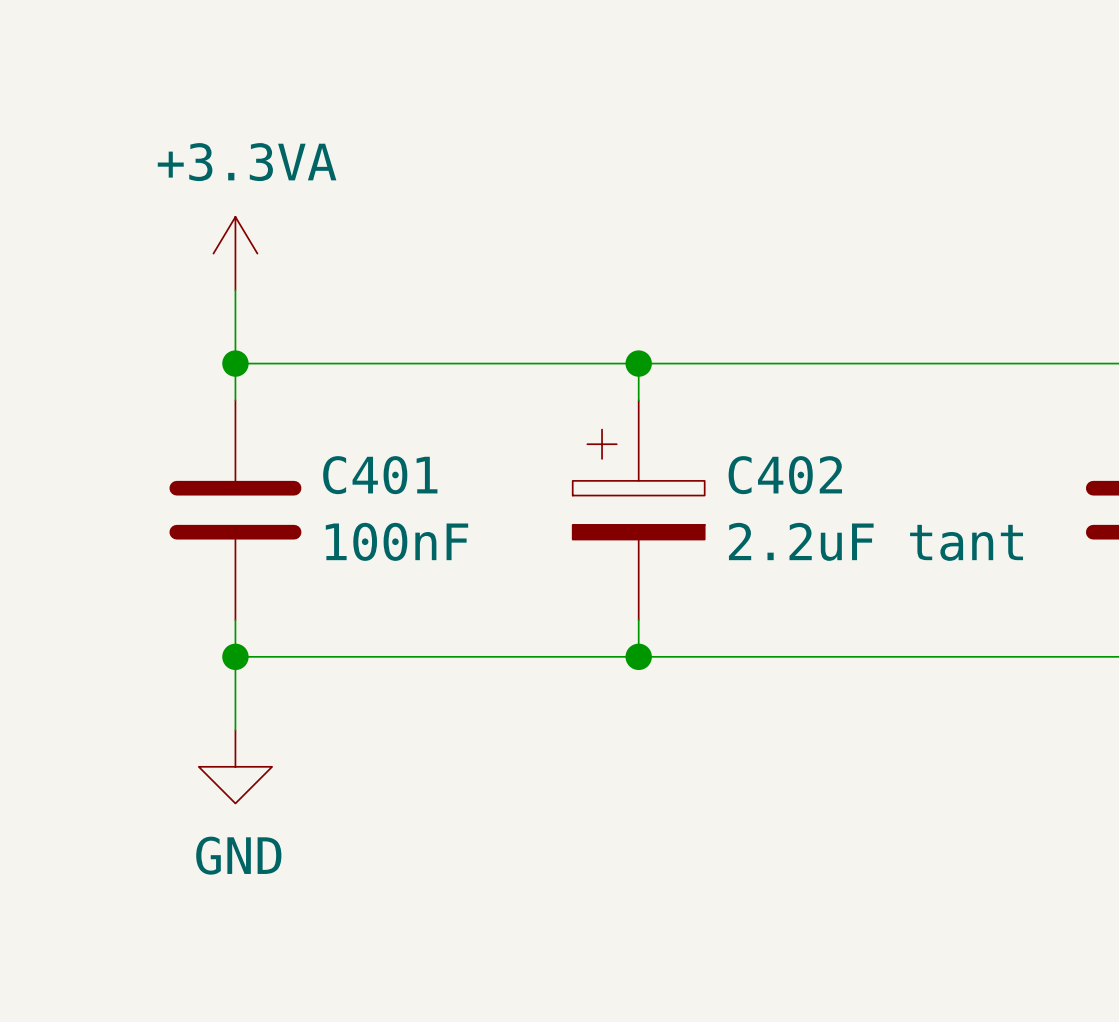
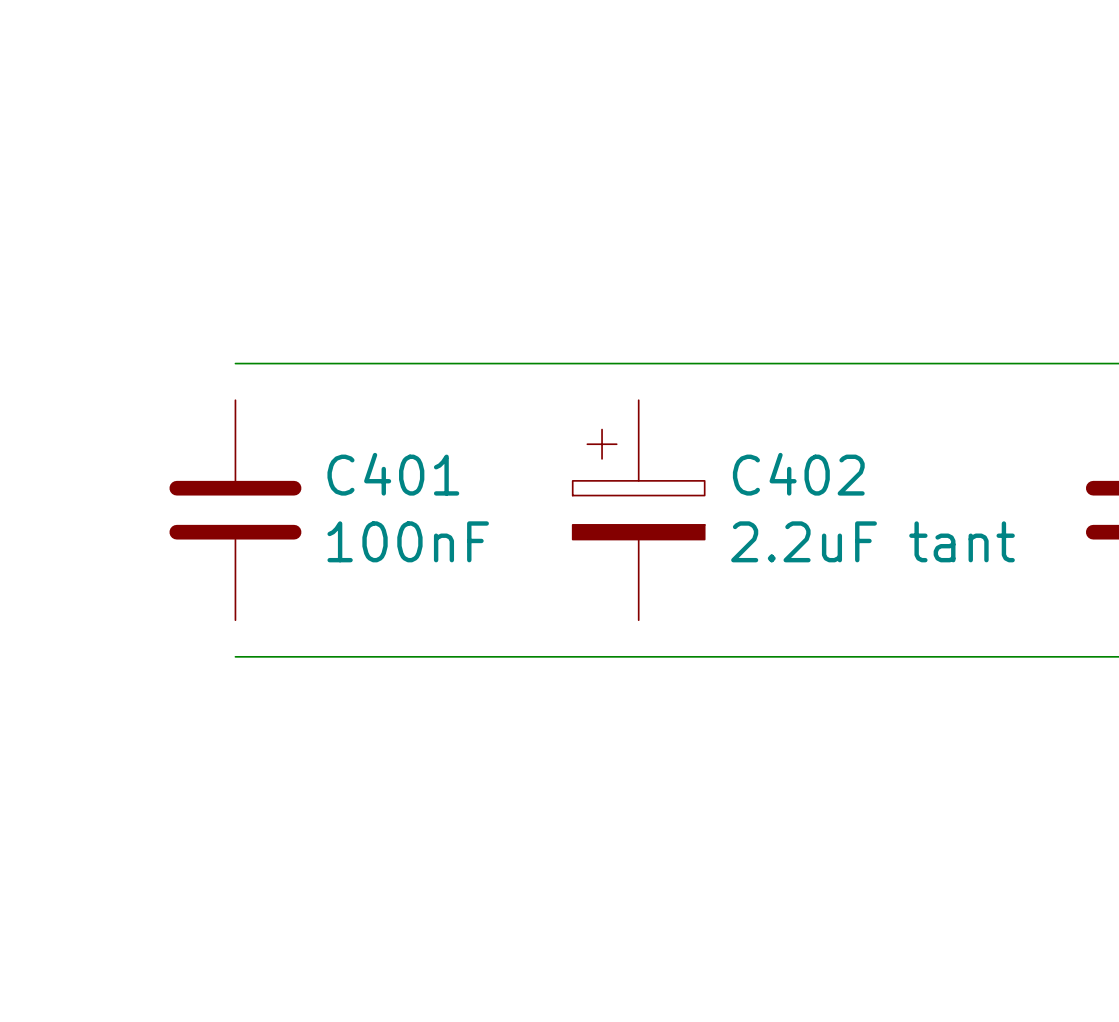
power symbol: +3.3VA (235, 253) -> none
wire: (235, 290) (235, 400) -> none
junction: (235, 363) -> none
wire: (638, 363) (638, 400) -> none
junction: (638, 363) -> none
wire: (235, 620) (235, 730) -> none
wire: (638, 620) (638, 656) -> none
junction: (235, 656) -> none
junction: (638, 656) -> none
power symbol: GND (235, 766) -> none

